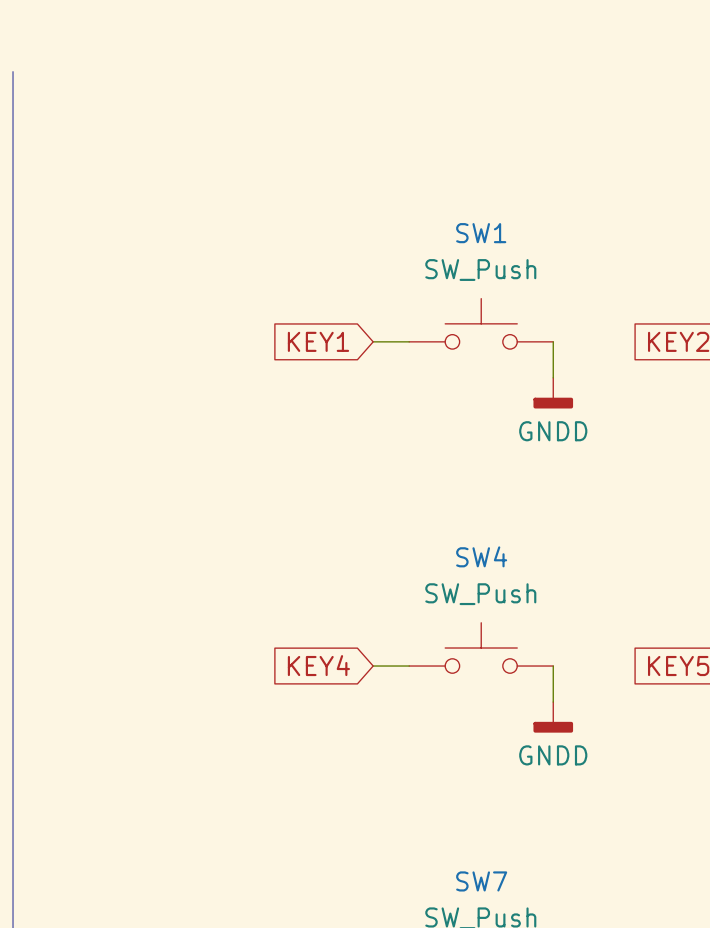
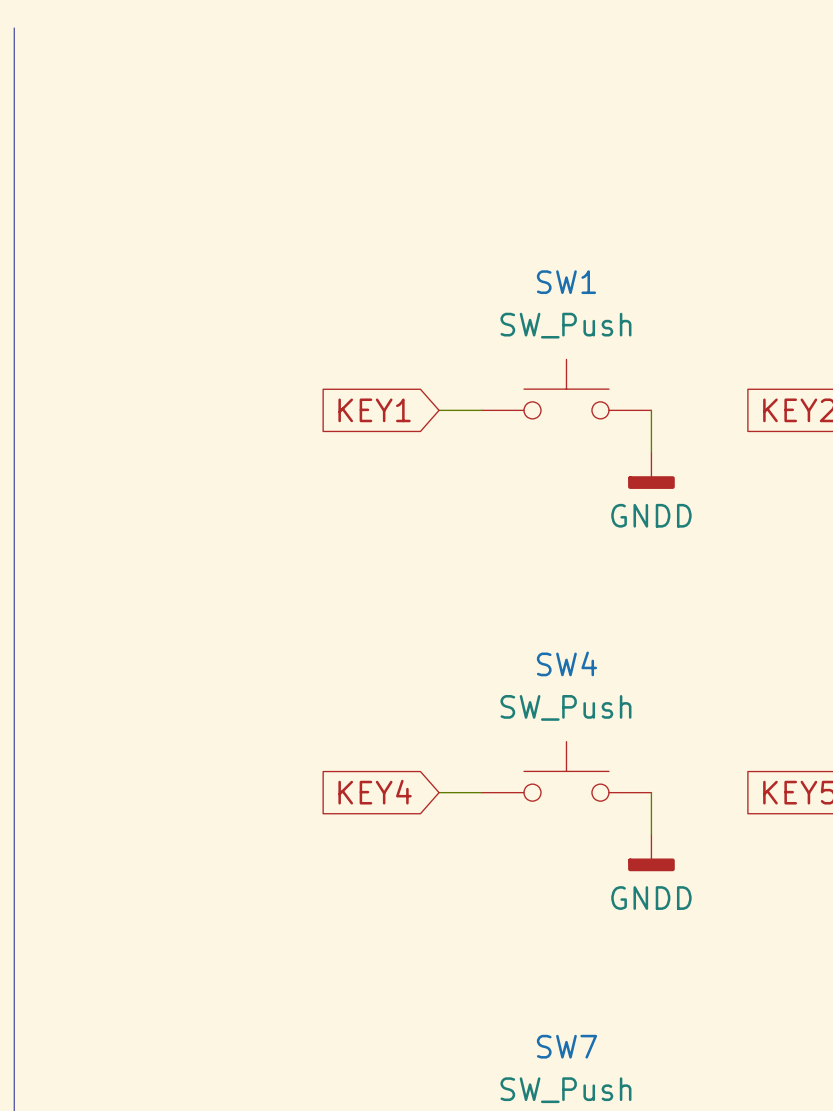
line: none -> (14, 28) (14, 91)

